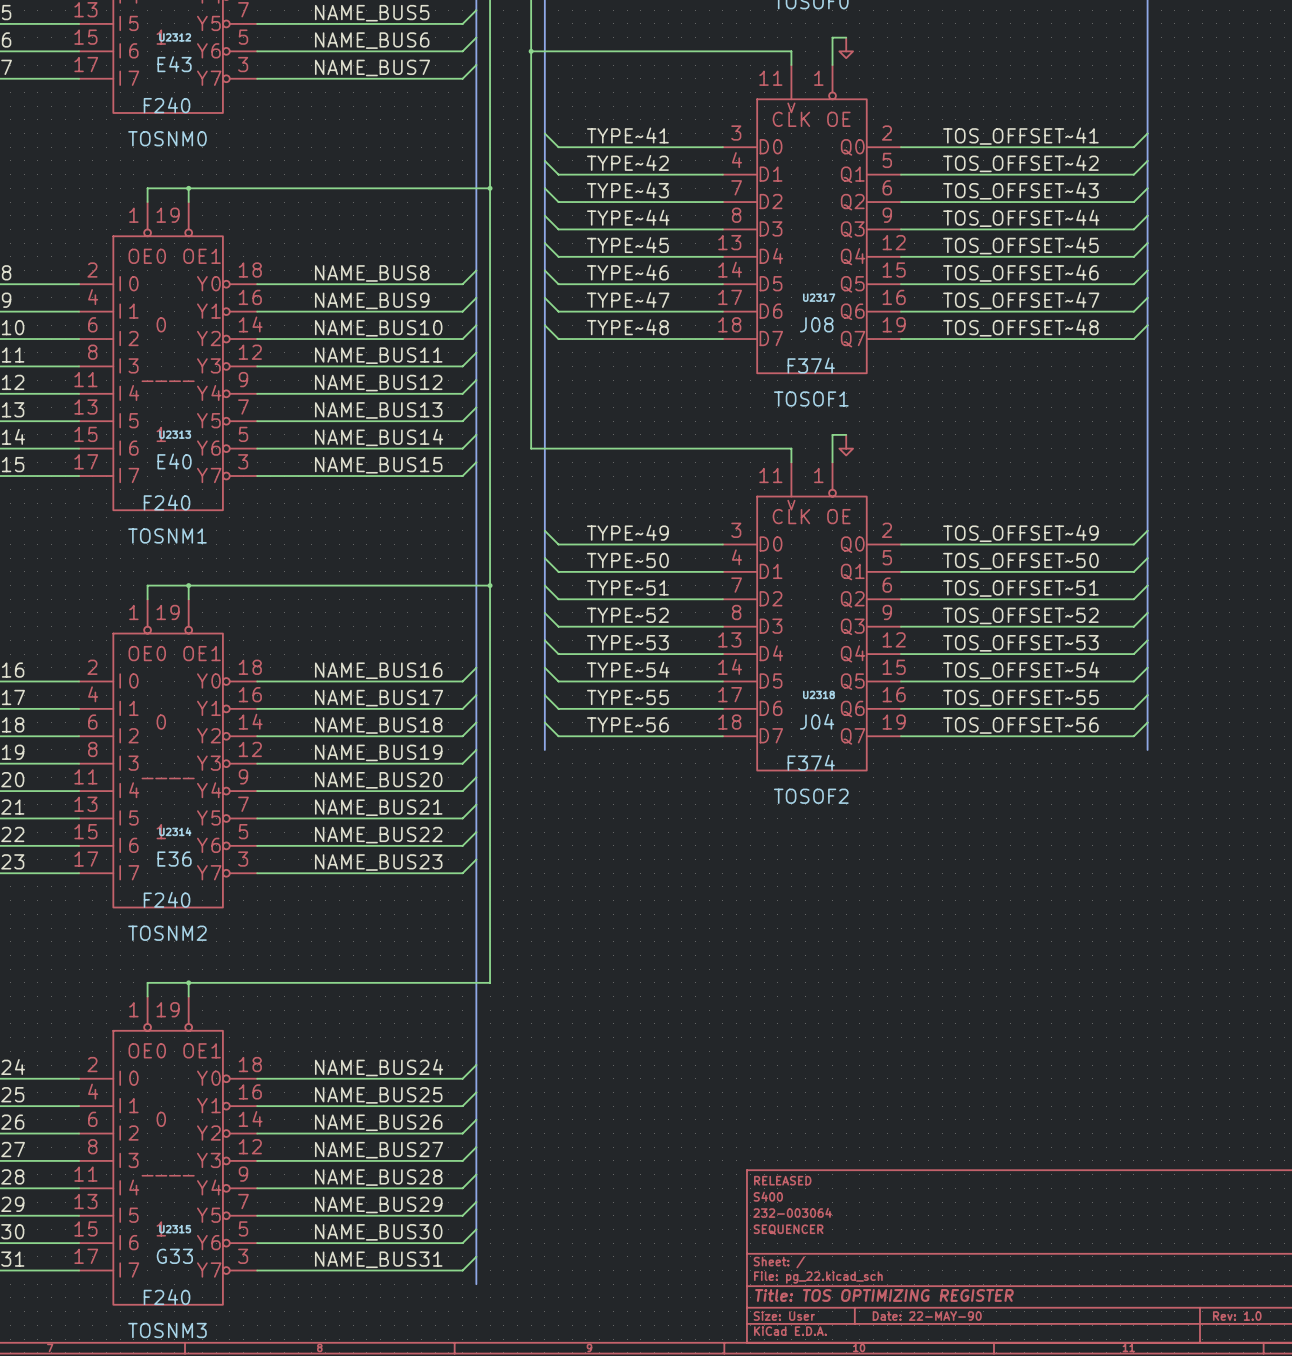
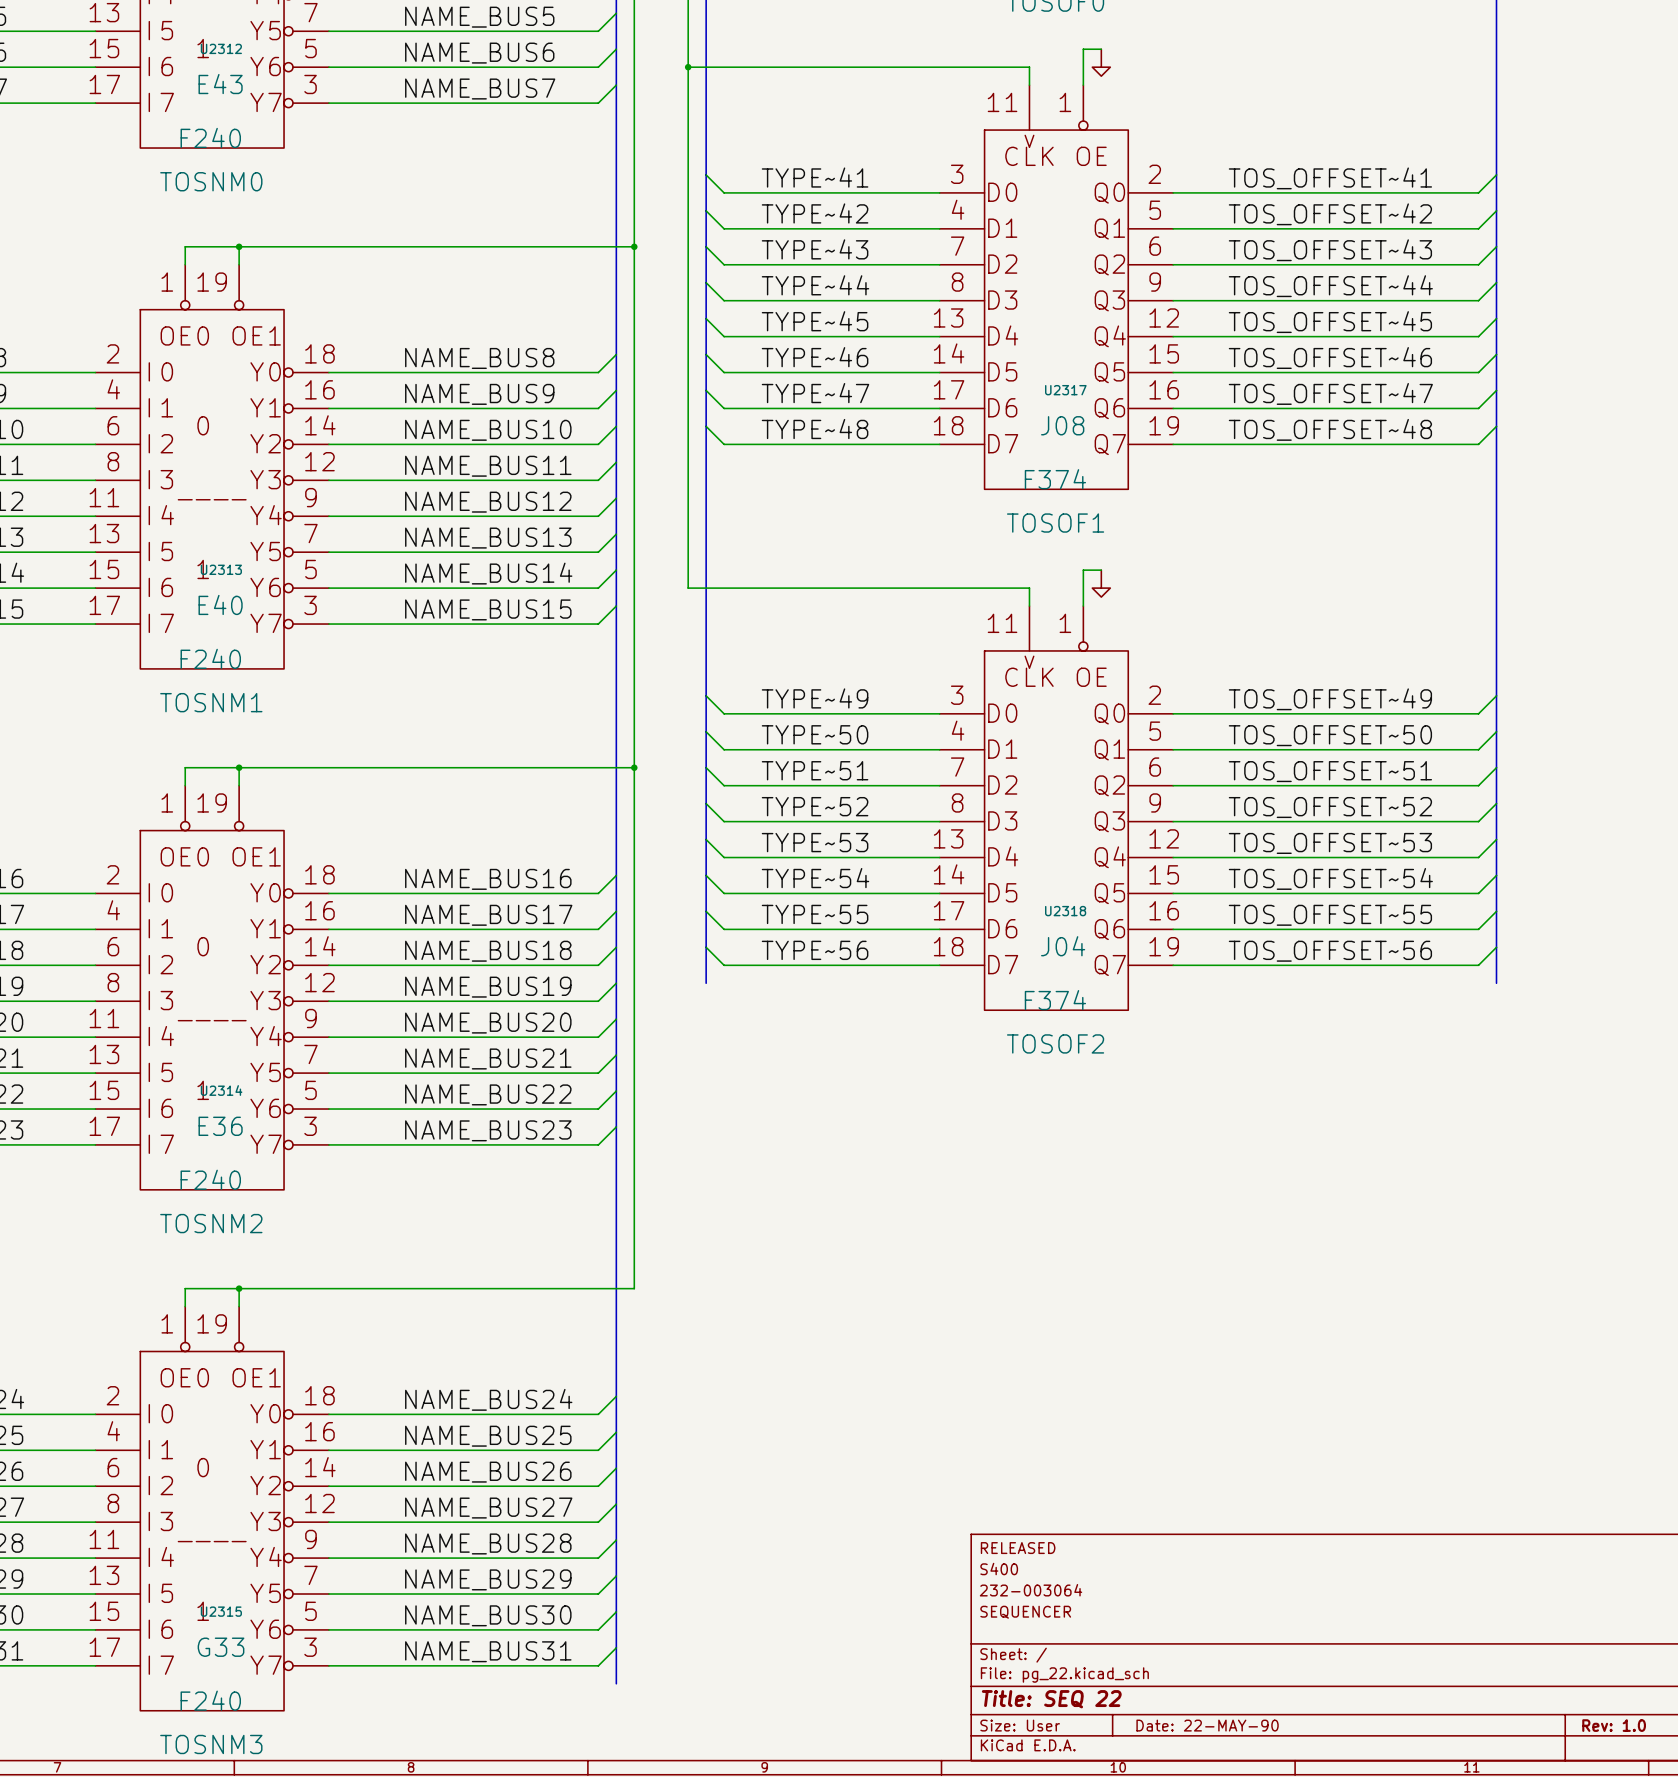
title block: Title: TOS OPTIMIZING REGISTER (884, 1295) -> Title: SEQ 22 (1051, 1699)

